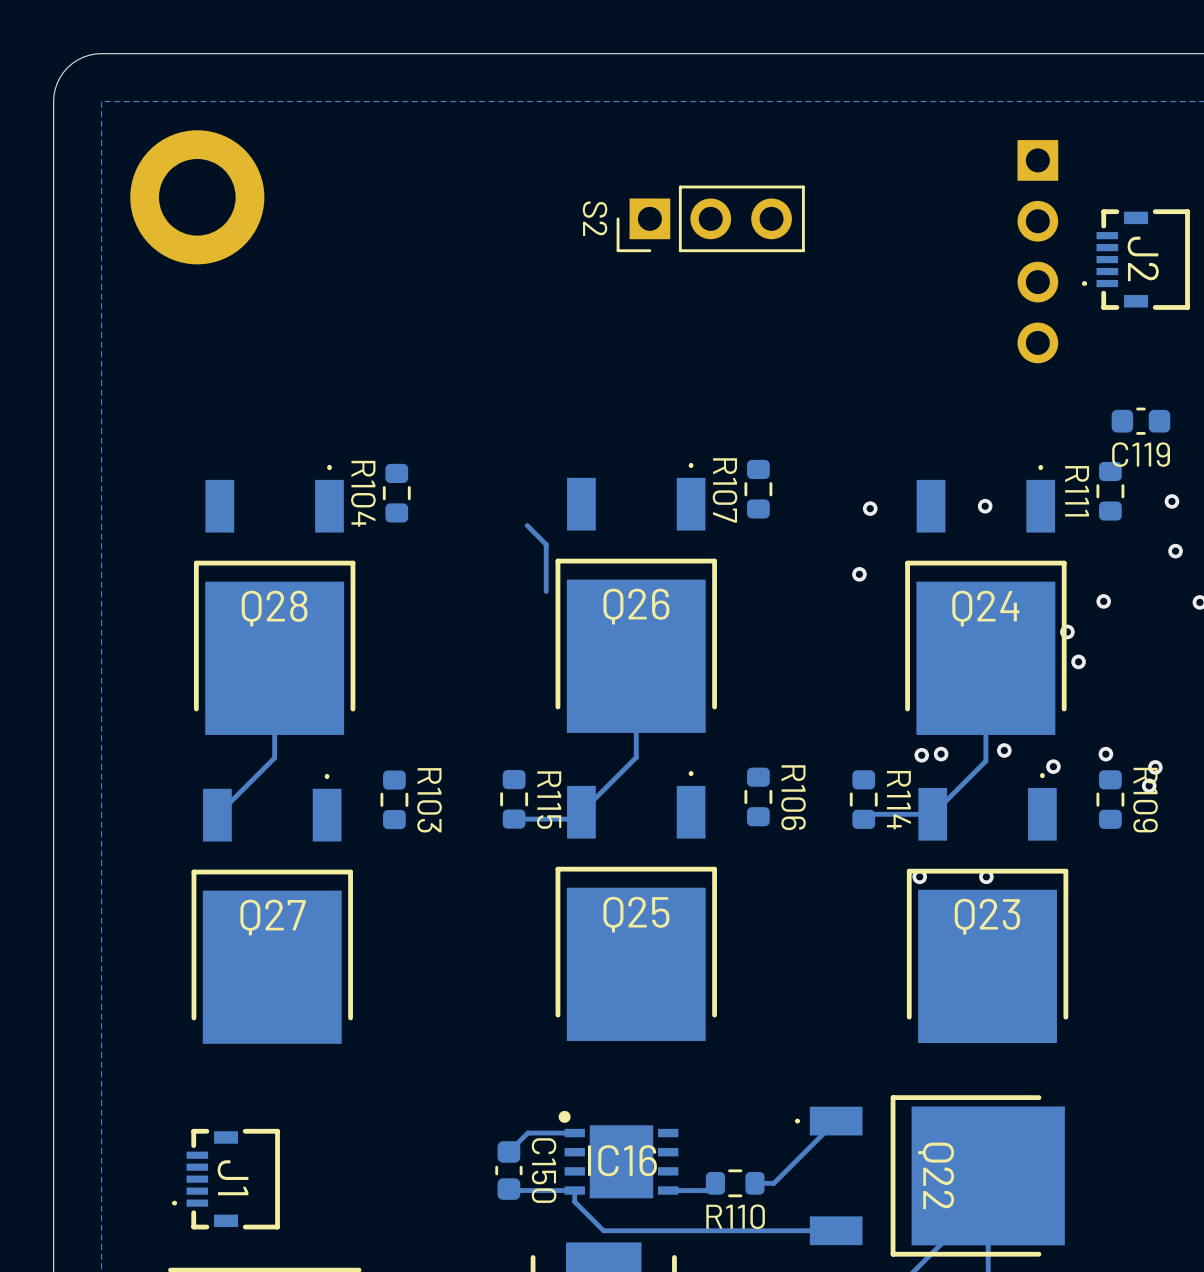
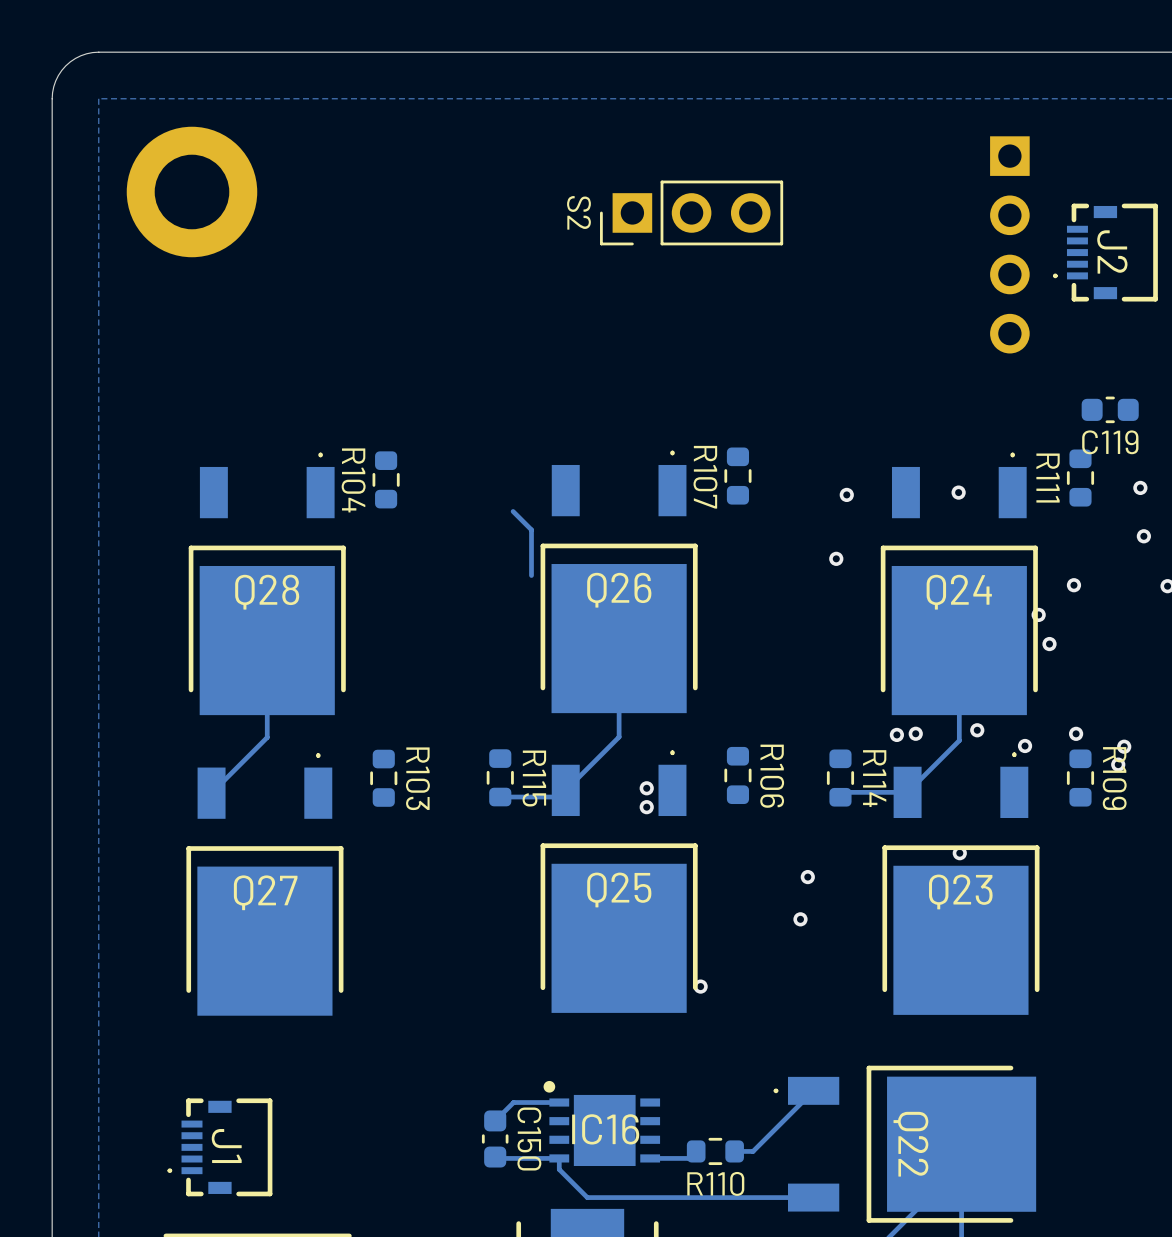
via: none -> (646, 788)
via: none -> (646, 807)
via: (919, 876) -> none
via: none -> (807, 877)
via: none -> (800, 919)
via: none -> (700, 986)

